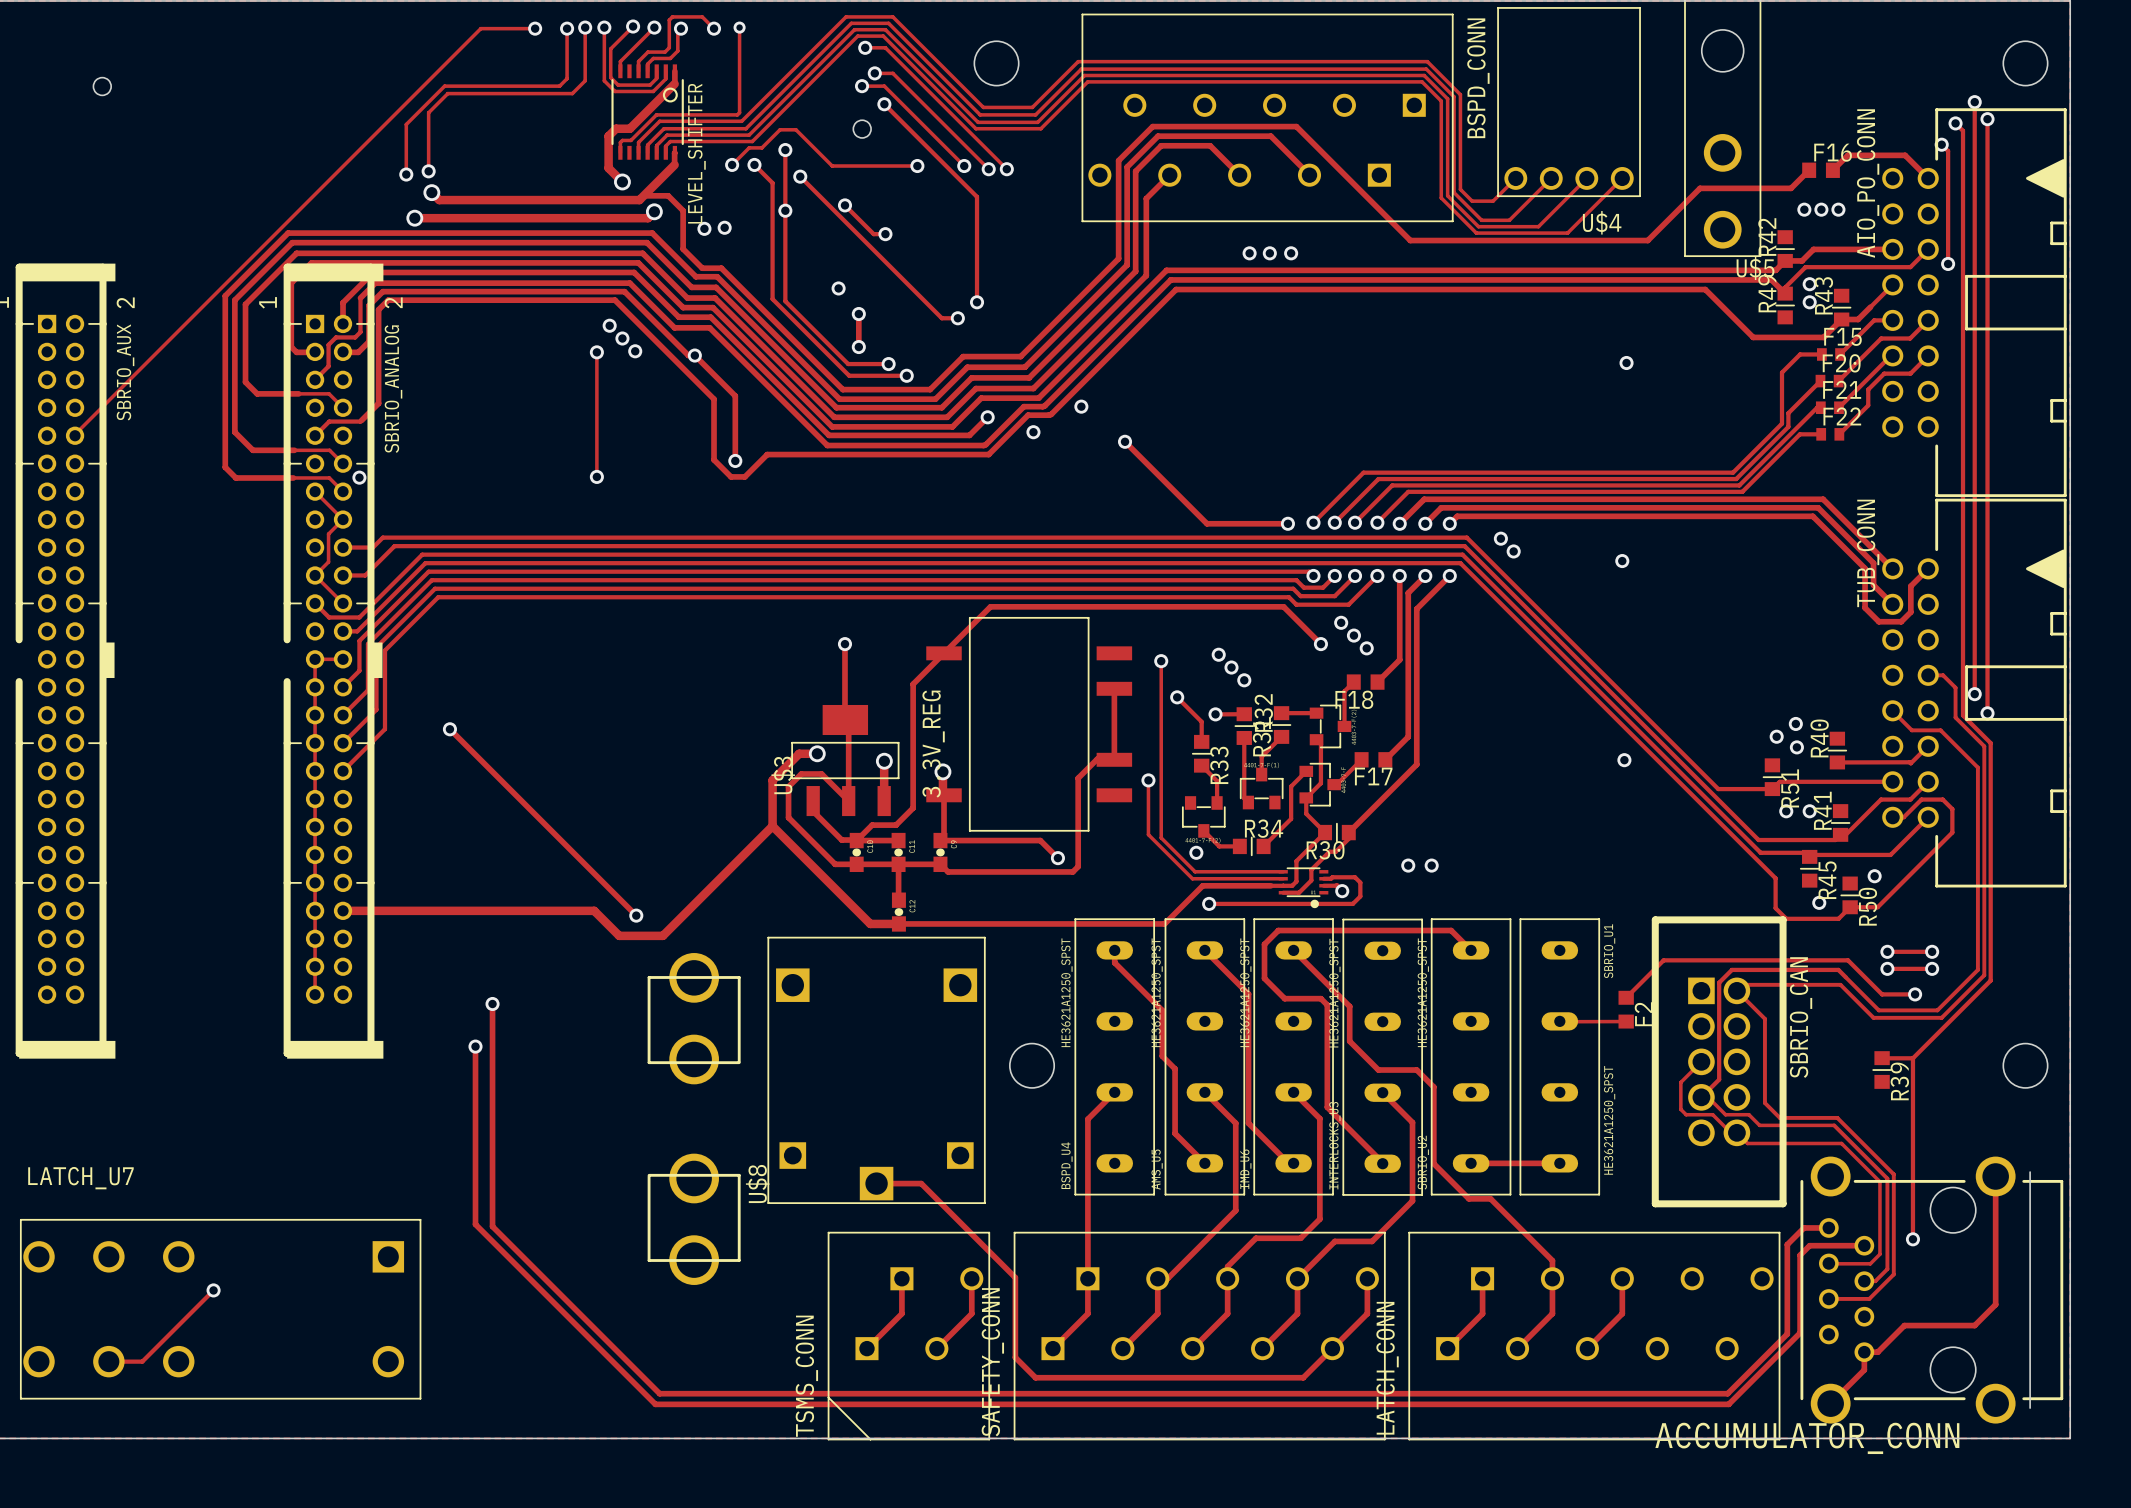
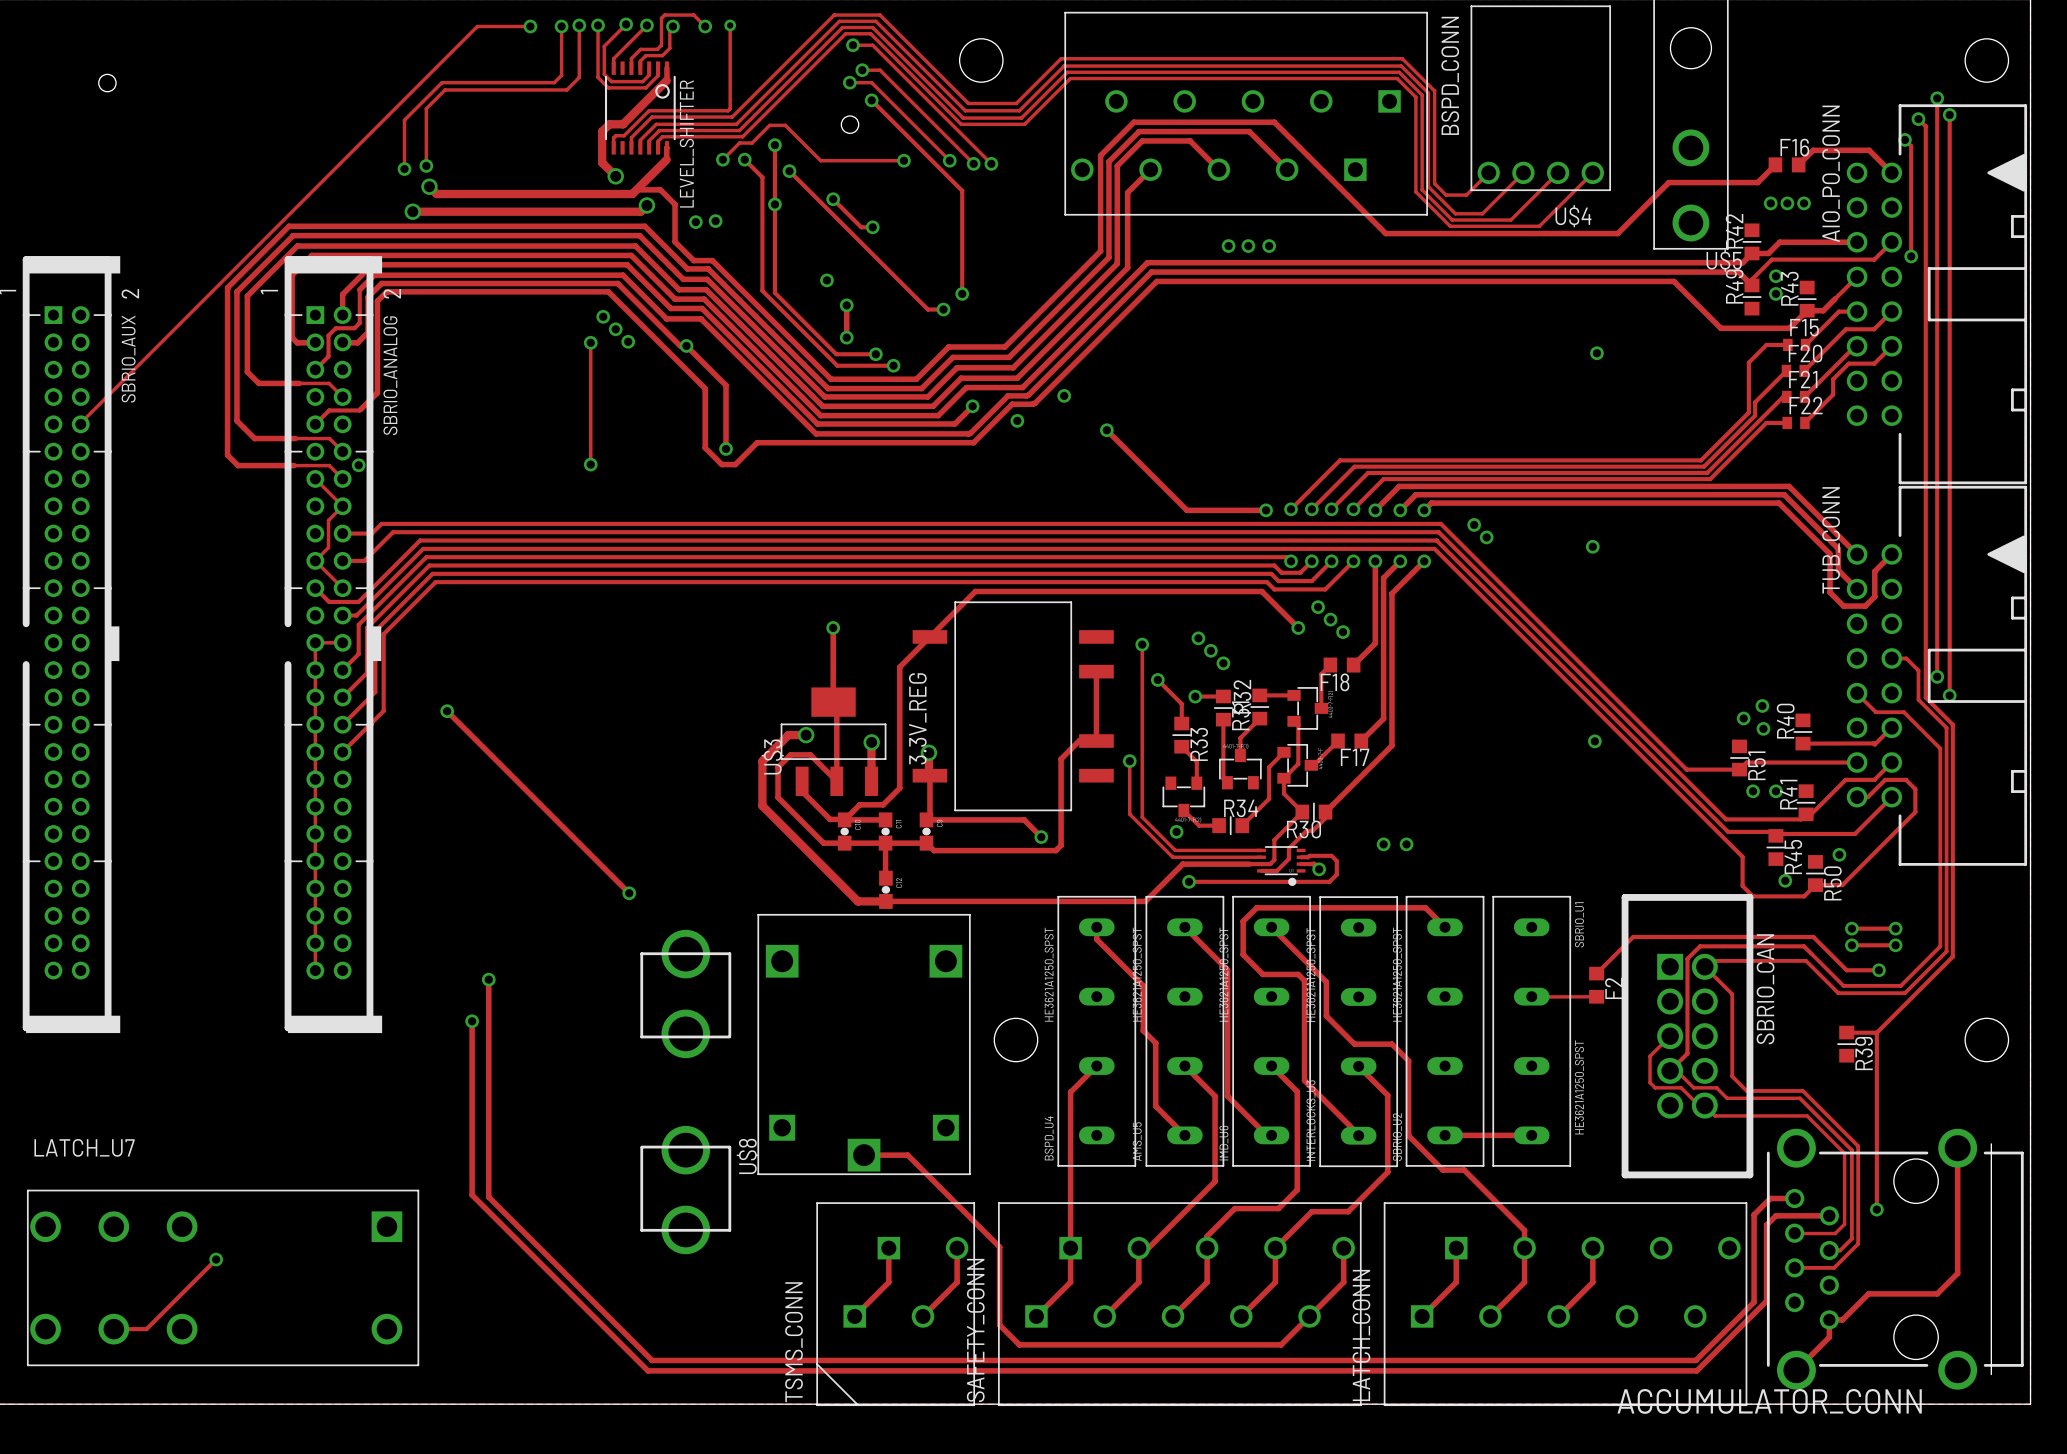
track: (772, 826) (662, 935) (619, 935) (594, 910) (343, 910) -> none

